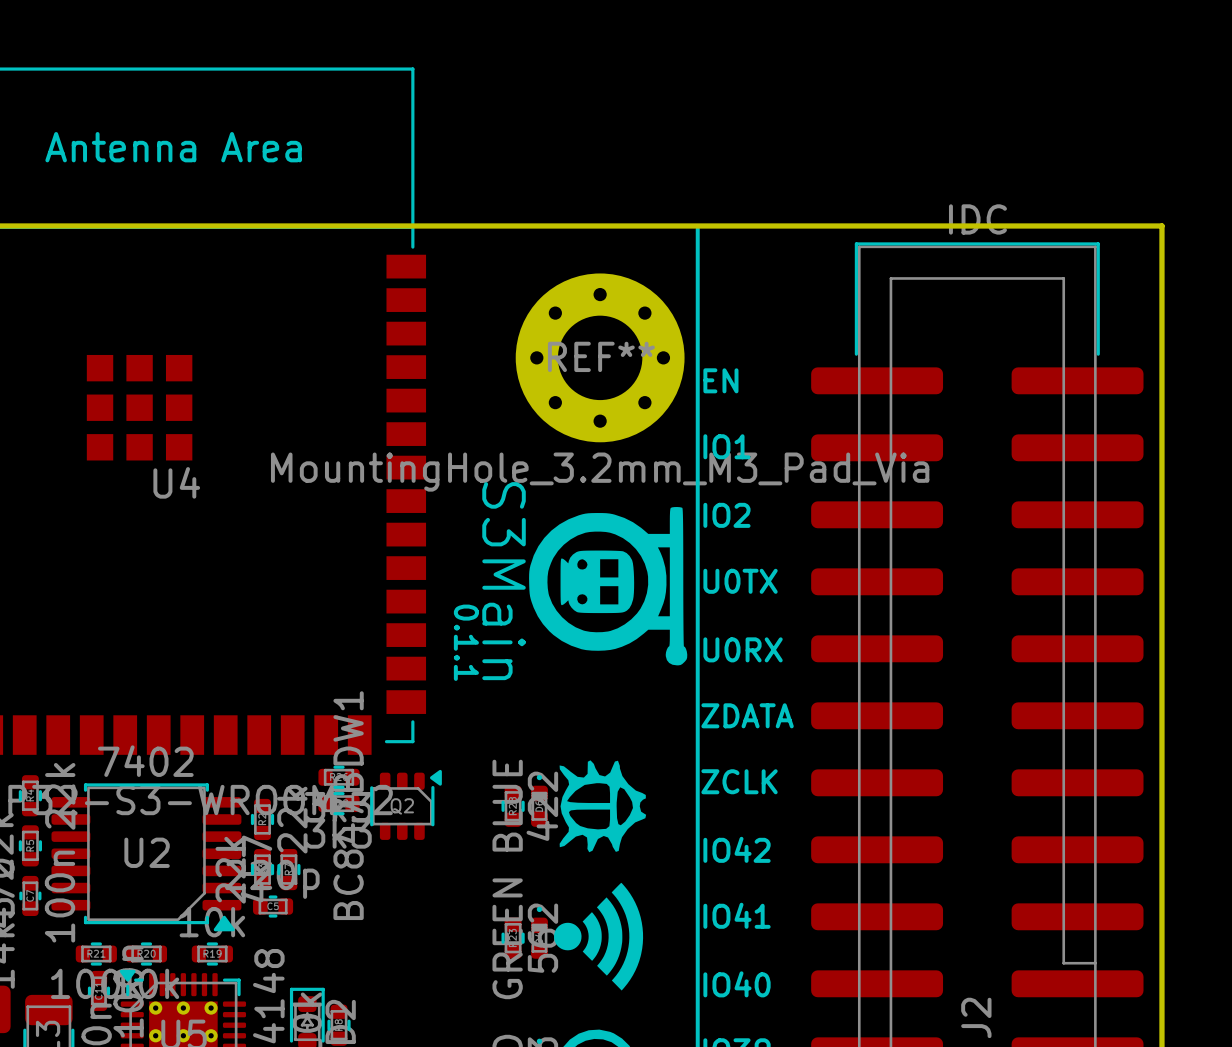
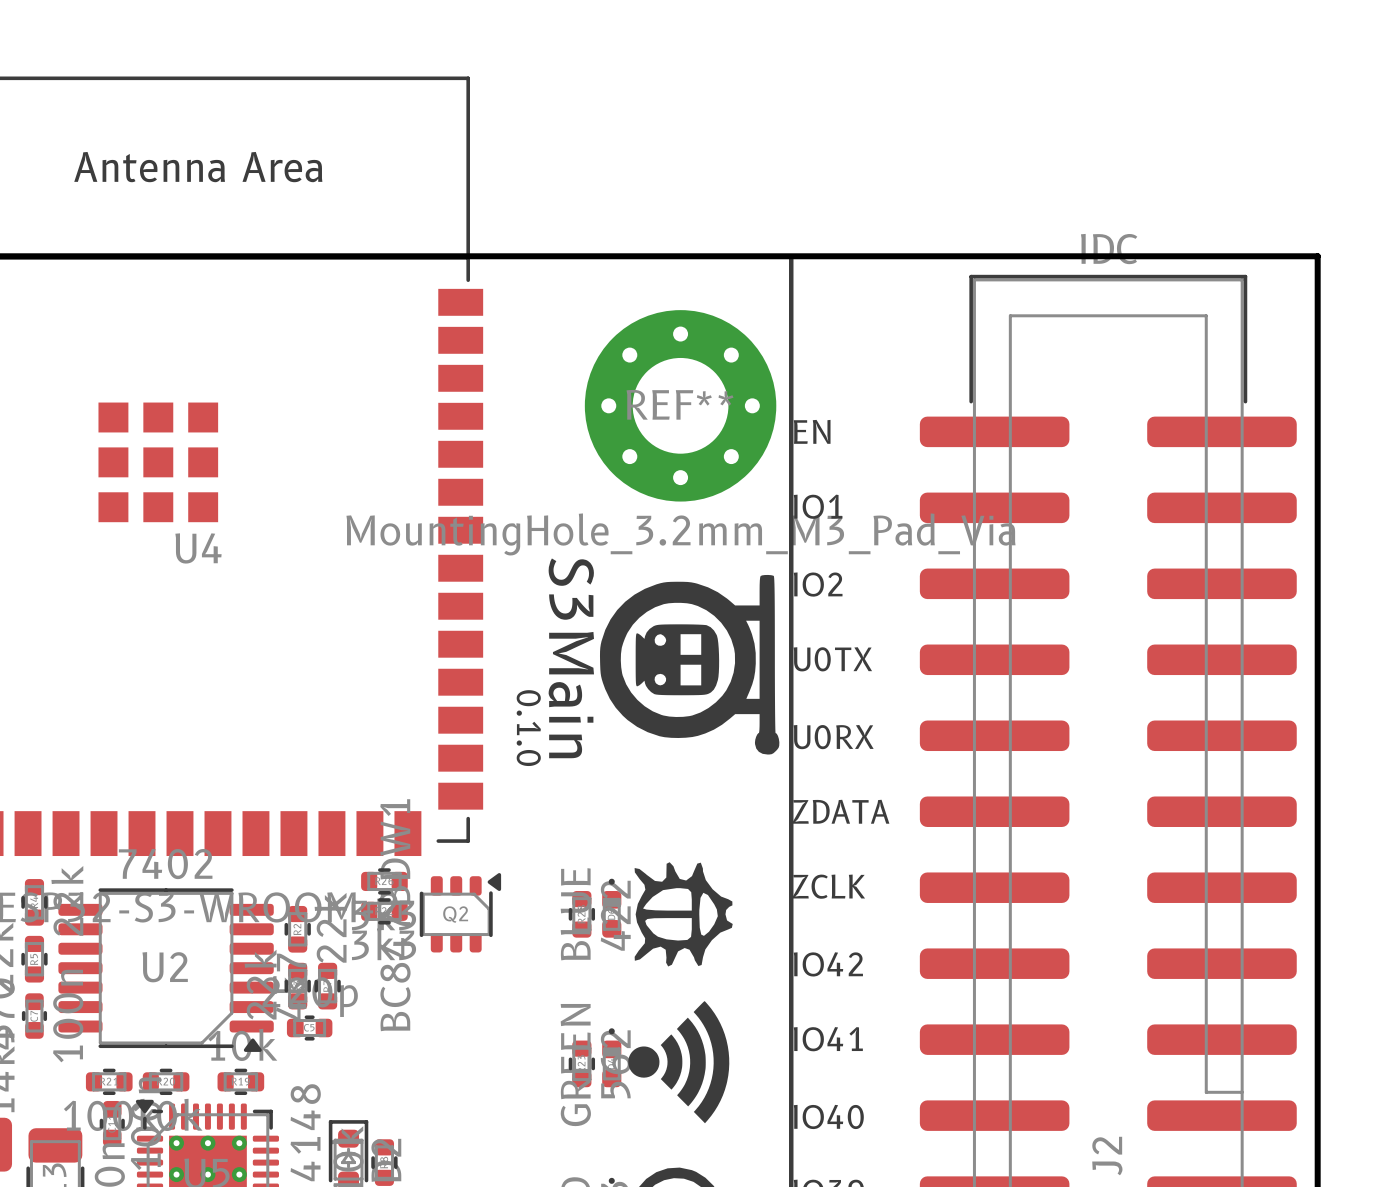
text: 0.1.1 (466, 642) -> 0.1.0 (528, 728)
U2 footprint: [51, 783, 242, 932] -> [58, 888, 274, 1052]

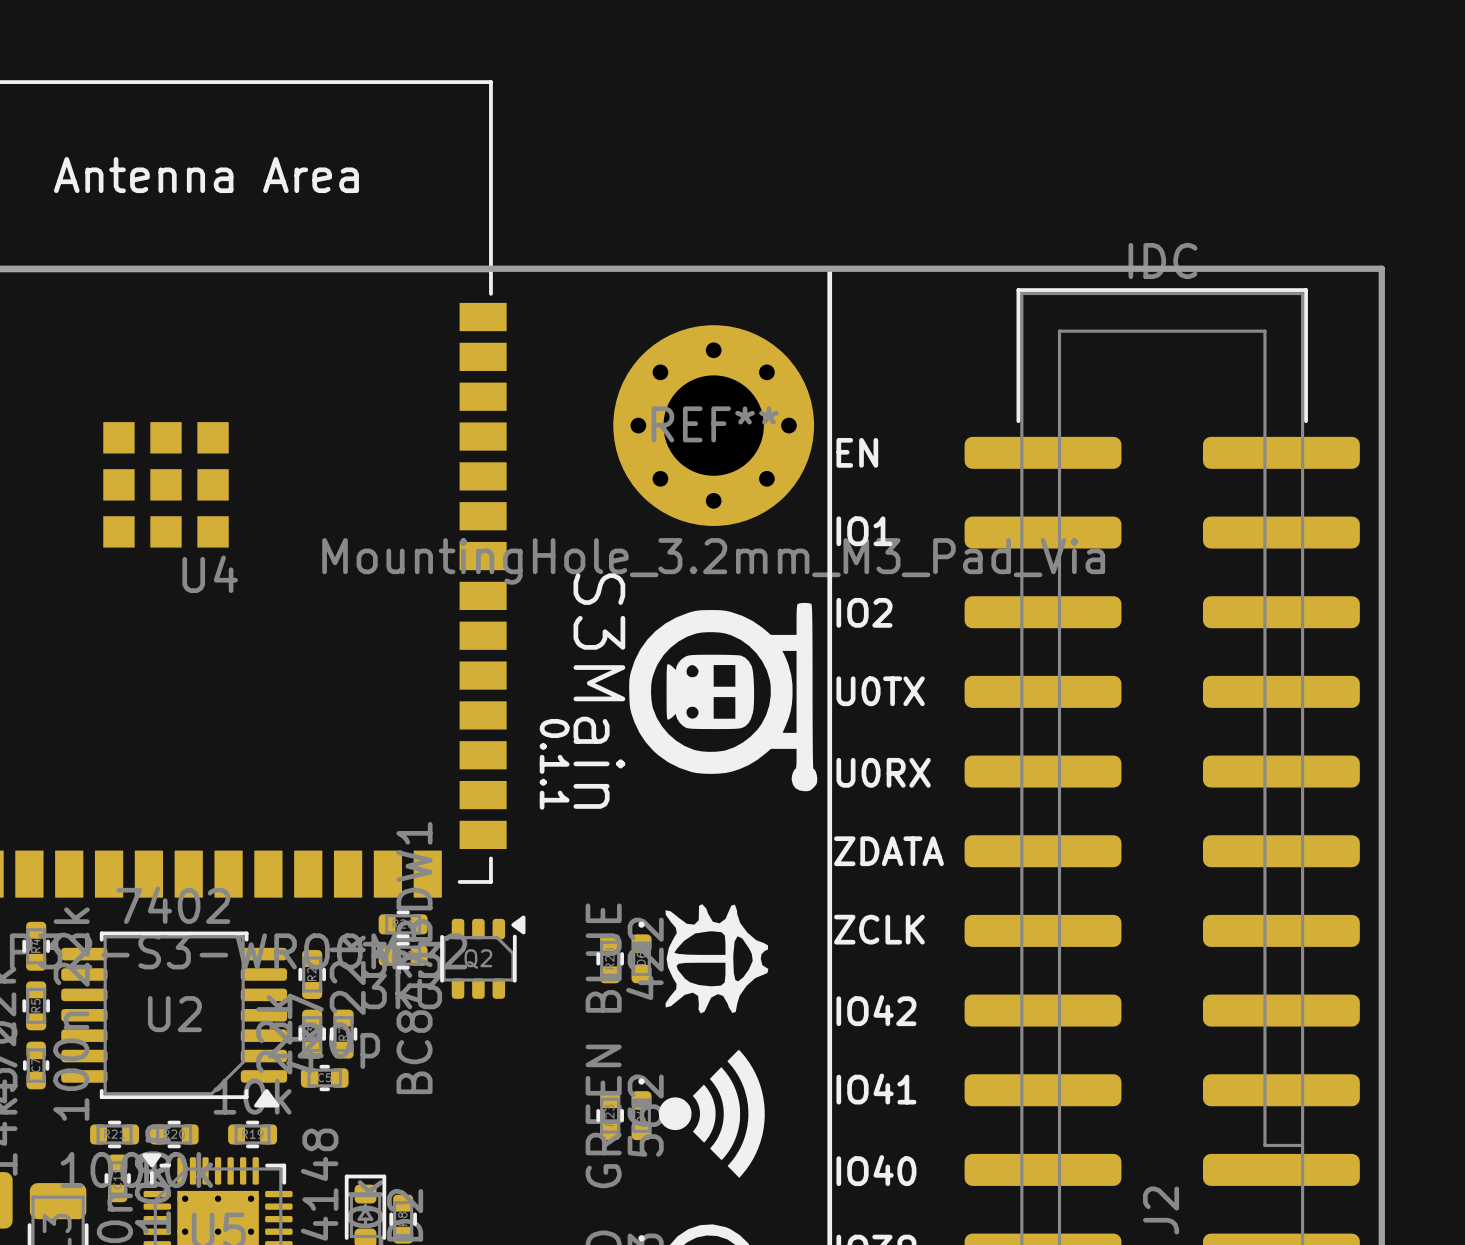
text: 0.1.0 (528, 728) -> 0.1.1 (554, 764)
U2 footprint: [58, 888, 274, 1052] -> [61, 931, 288, 1108]

